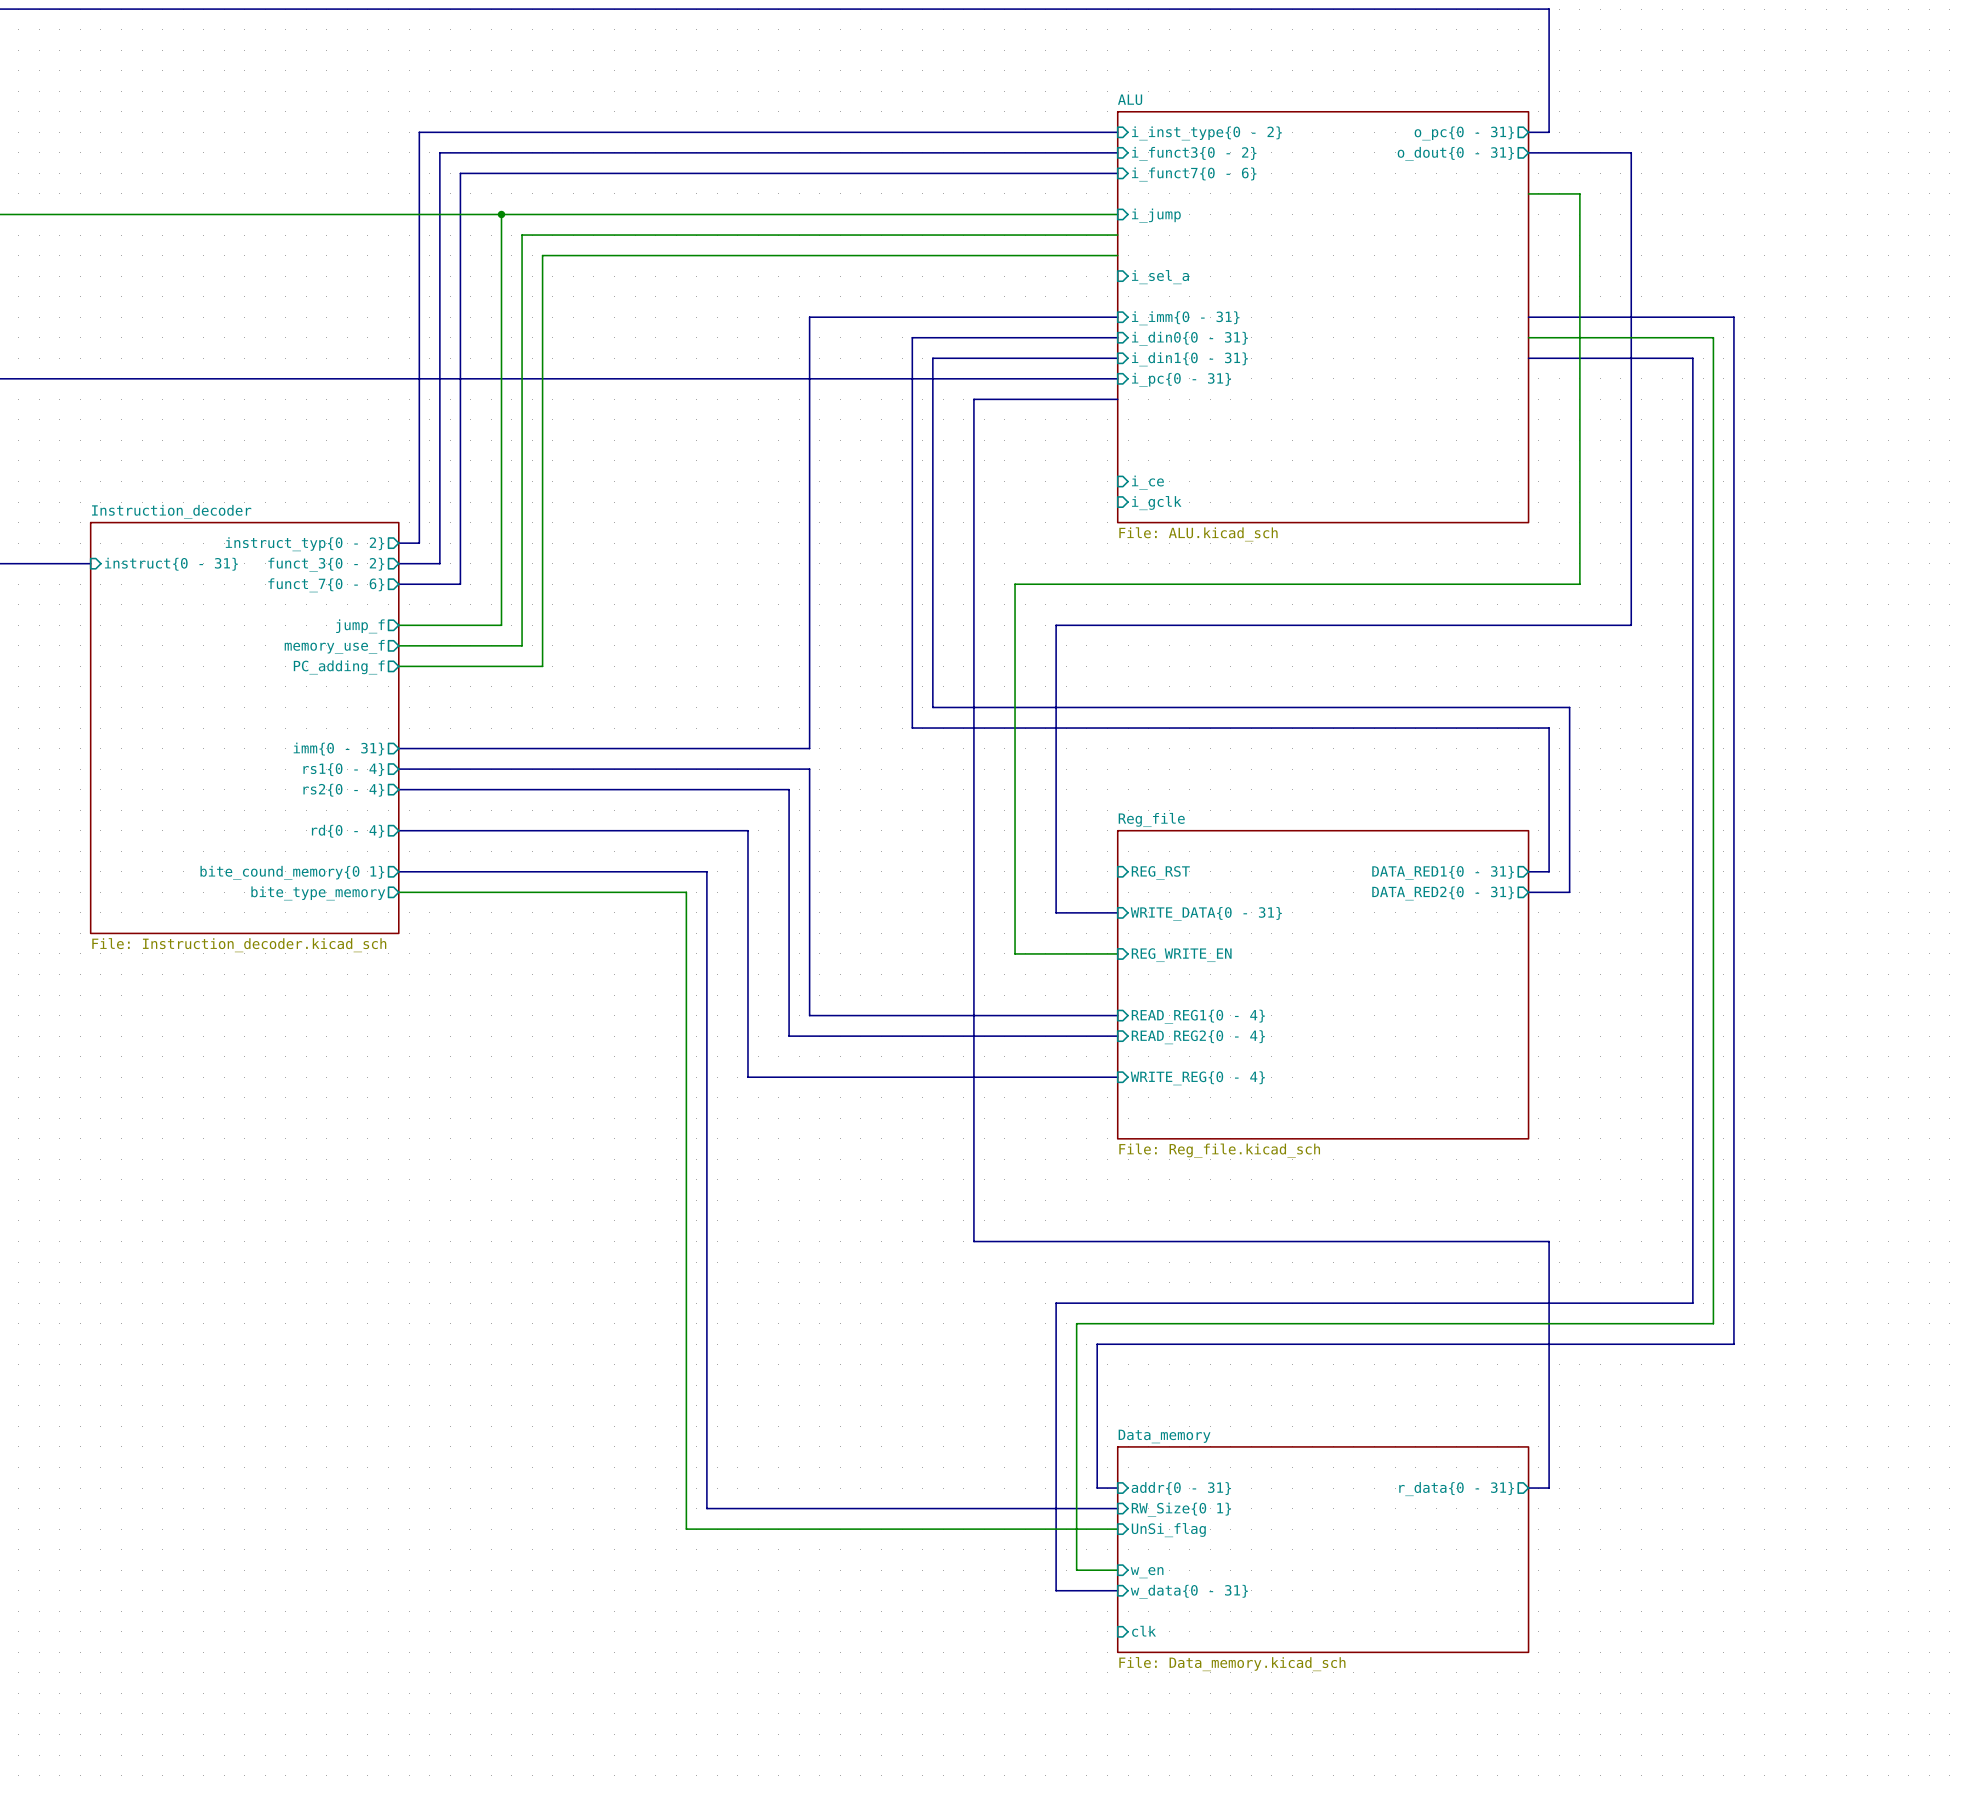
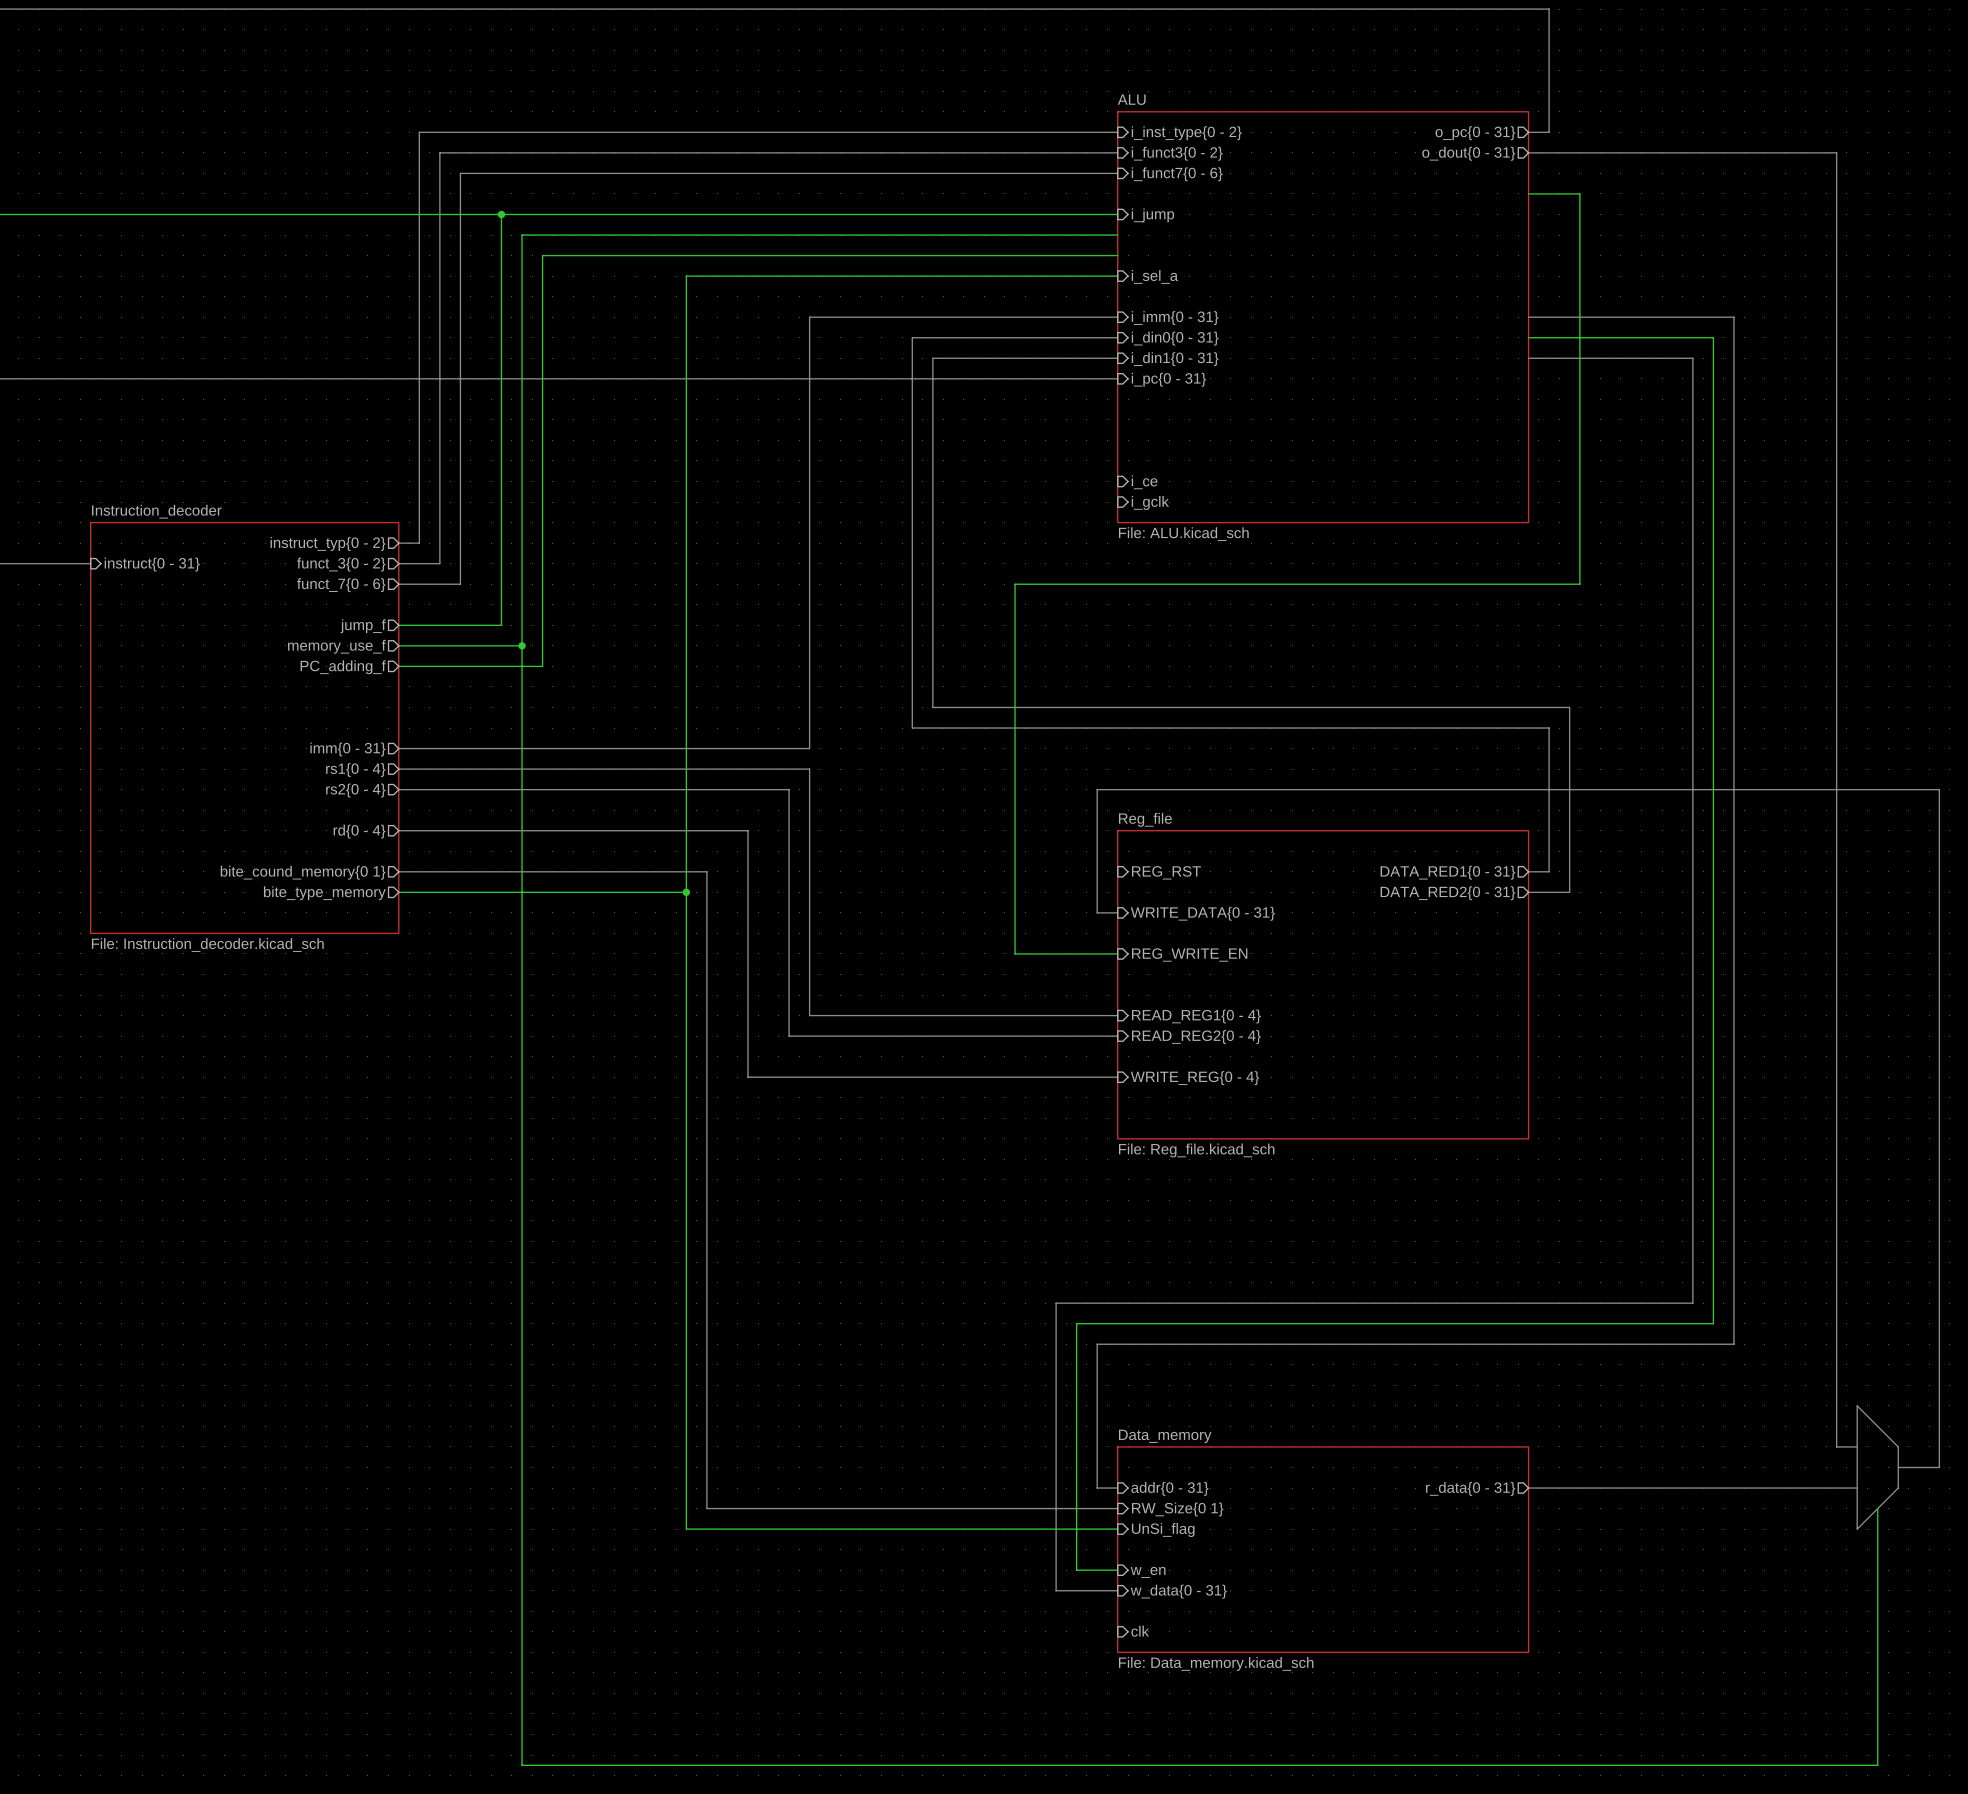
bus: (1631, 152) (1631, 625) (1056, 625) (1056, 912) (1097, 912) -> (1631, 152) (1836, 152) (1836, 1446) (1857, 1446)
wire: none -> (1117, 276) (686, 276) (686, 892)
bus: (1117, 399) (973, 399) (973, 1241) (1549, 1241) (1549, 1488) -> (1857, 1488) (1549, 1488)
wire: none -> (522, 645) (522, 1765) (1877, 1765) (1877, 1508)
junction: none -> (522, 645)
junction: none -> (686, 892)
bus: none -> (1097, 912) (1097, 789) (1939, 789) (1939, 1467) (1898, 1467)
line: none -> (1857, 1405) (1857, 1529) (1898, 1488) (1898, 1446) (1857, 1405)

